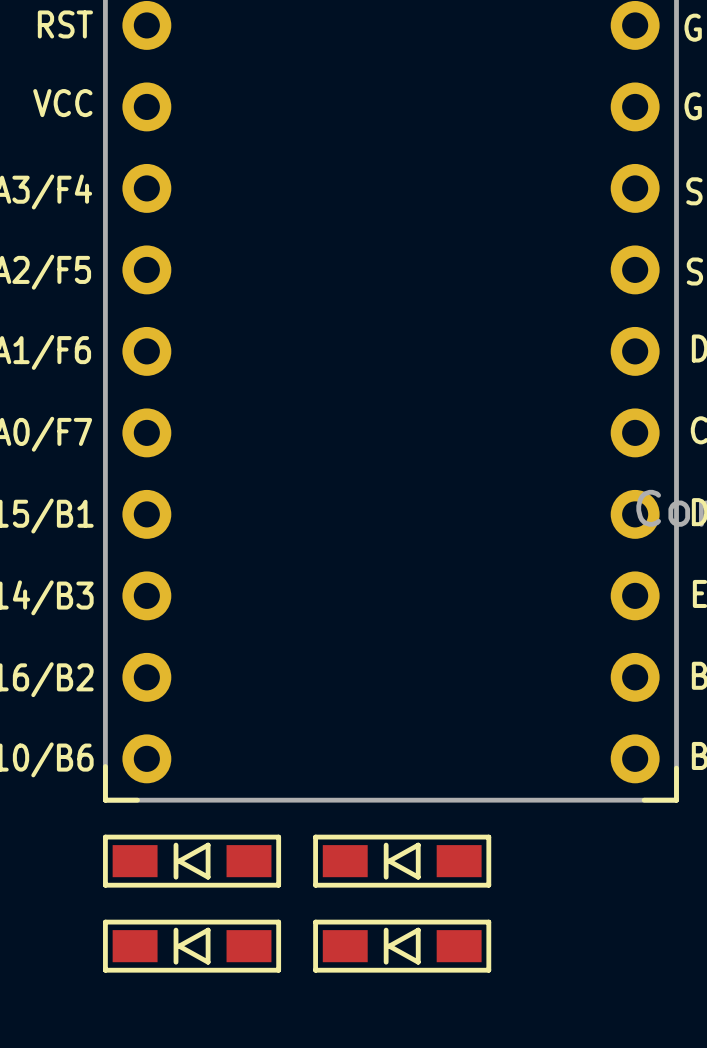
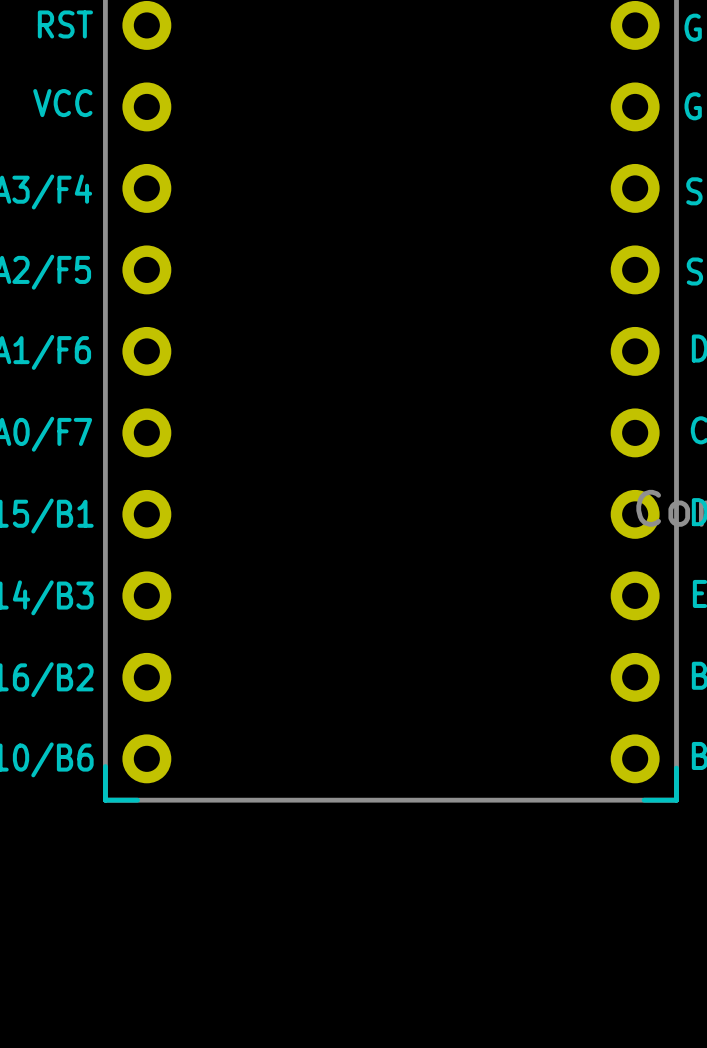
part: (192, 861) -> none
part: (402, 861) -> none
part: (192, 946) -> none
part: (402, 946) -> none

